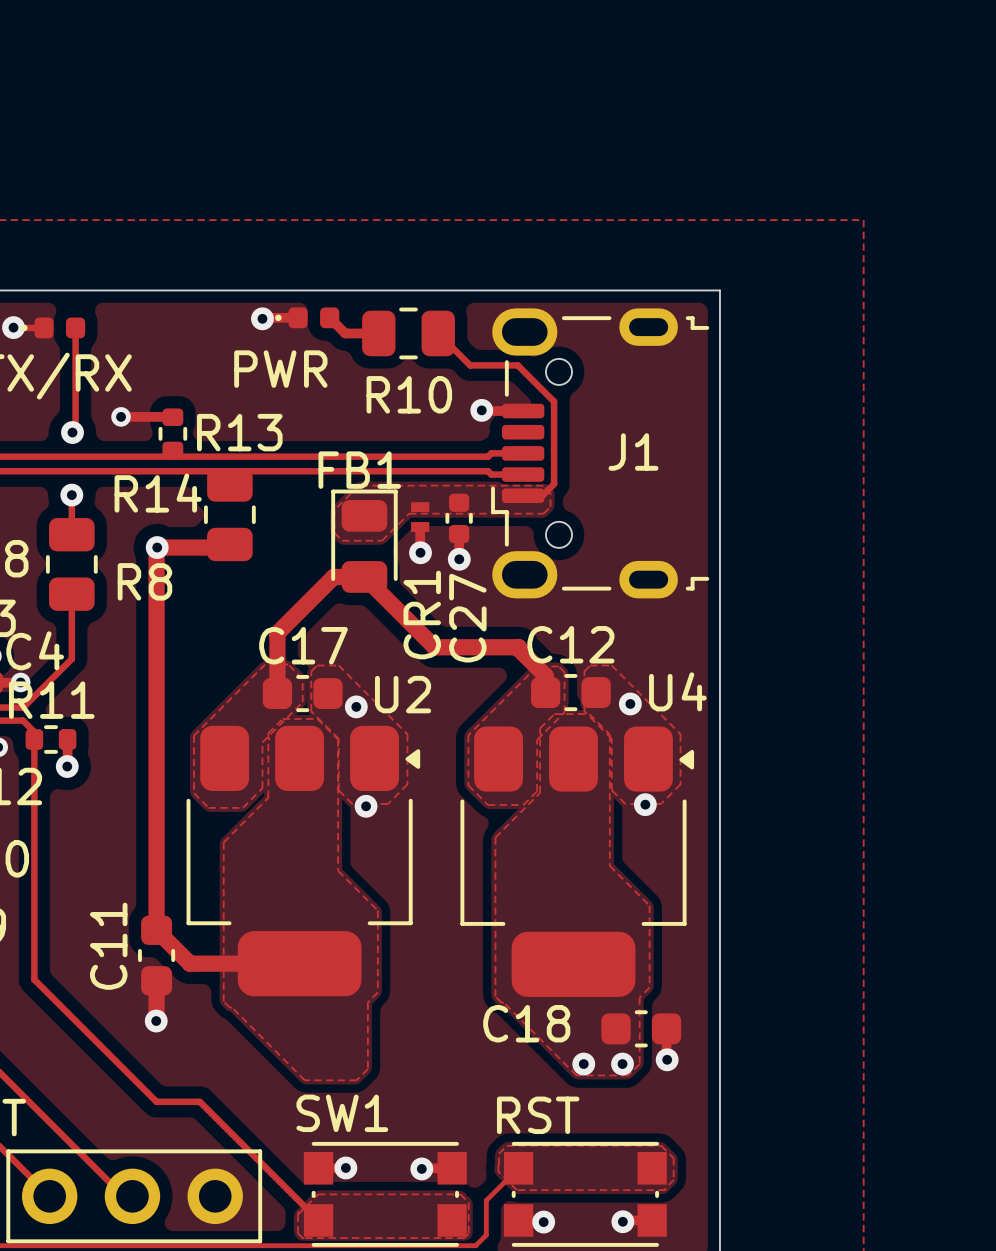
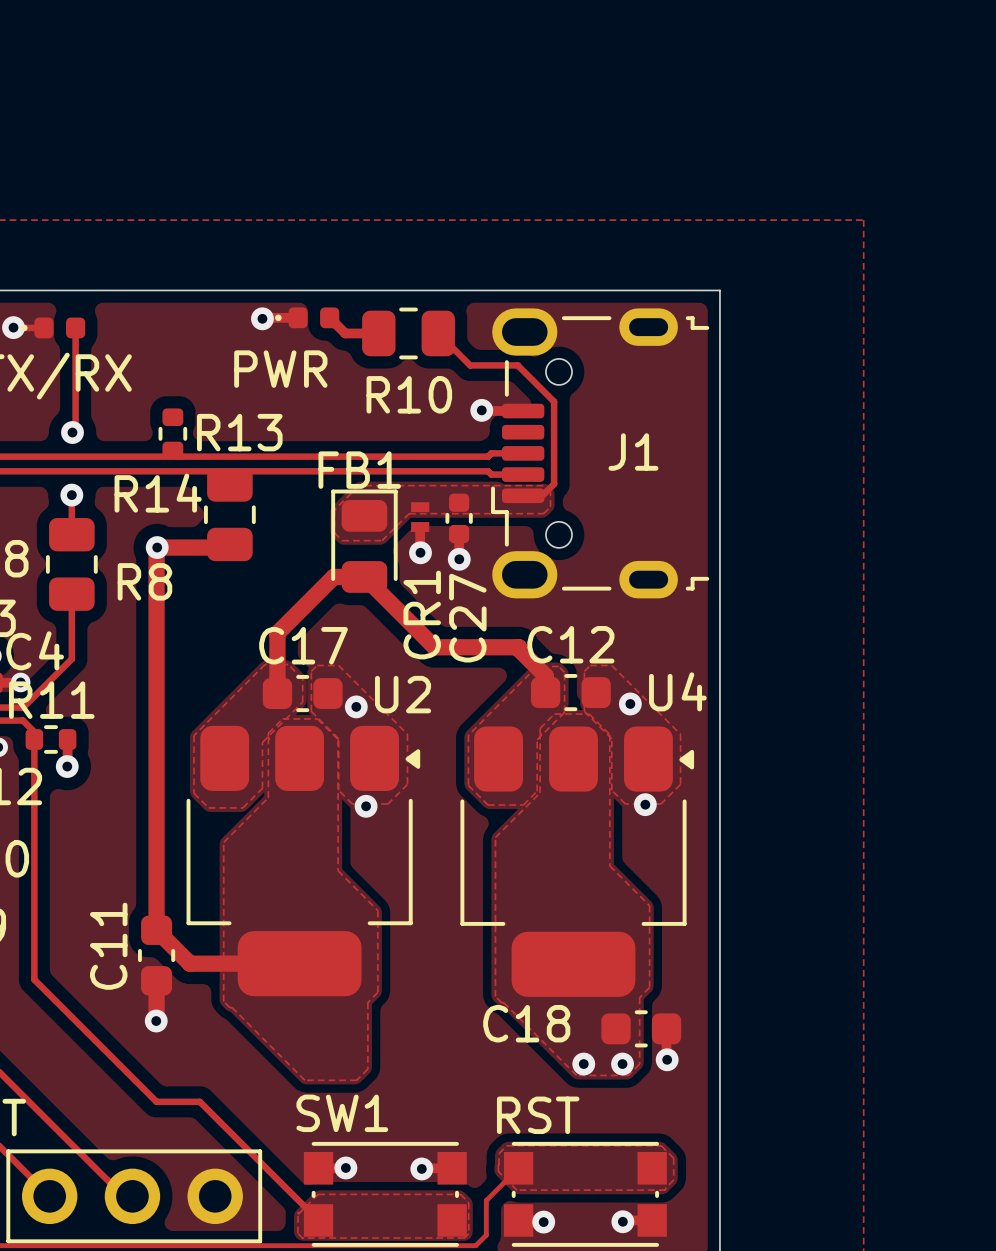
track: (121, 416) (172, 416) -> none
via: (121, 416) -> none

